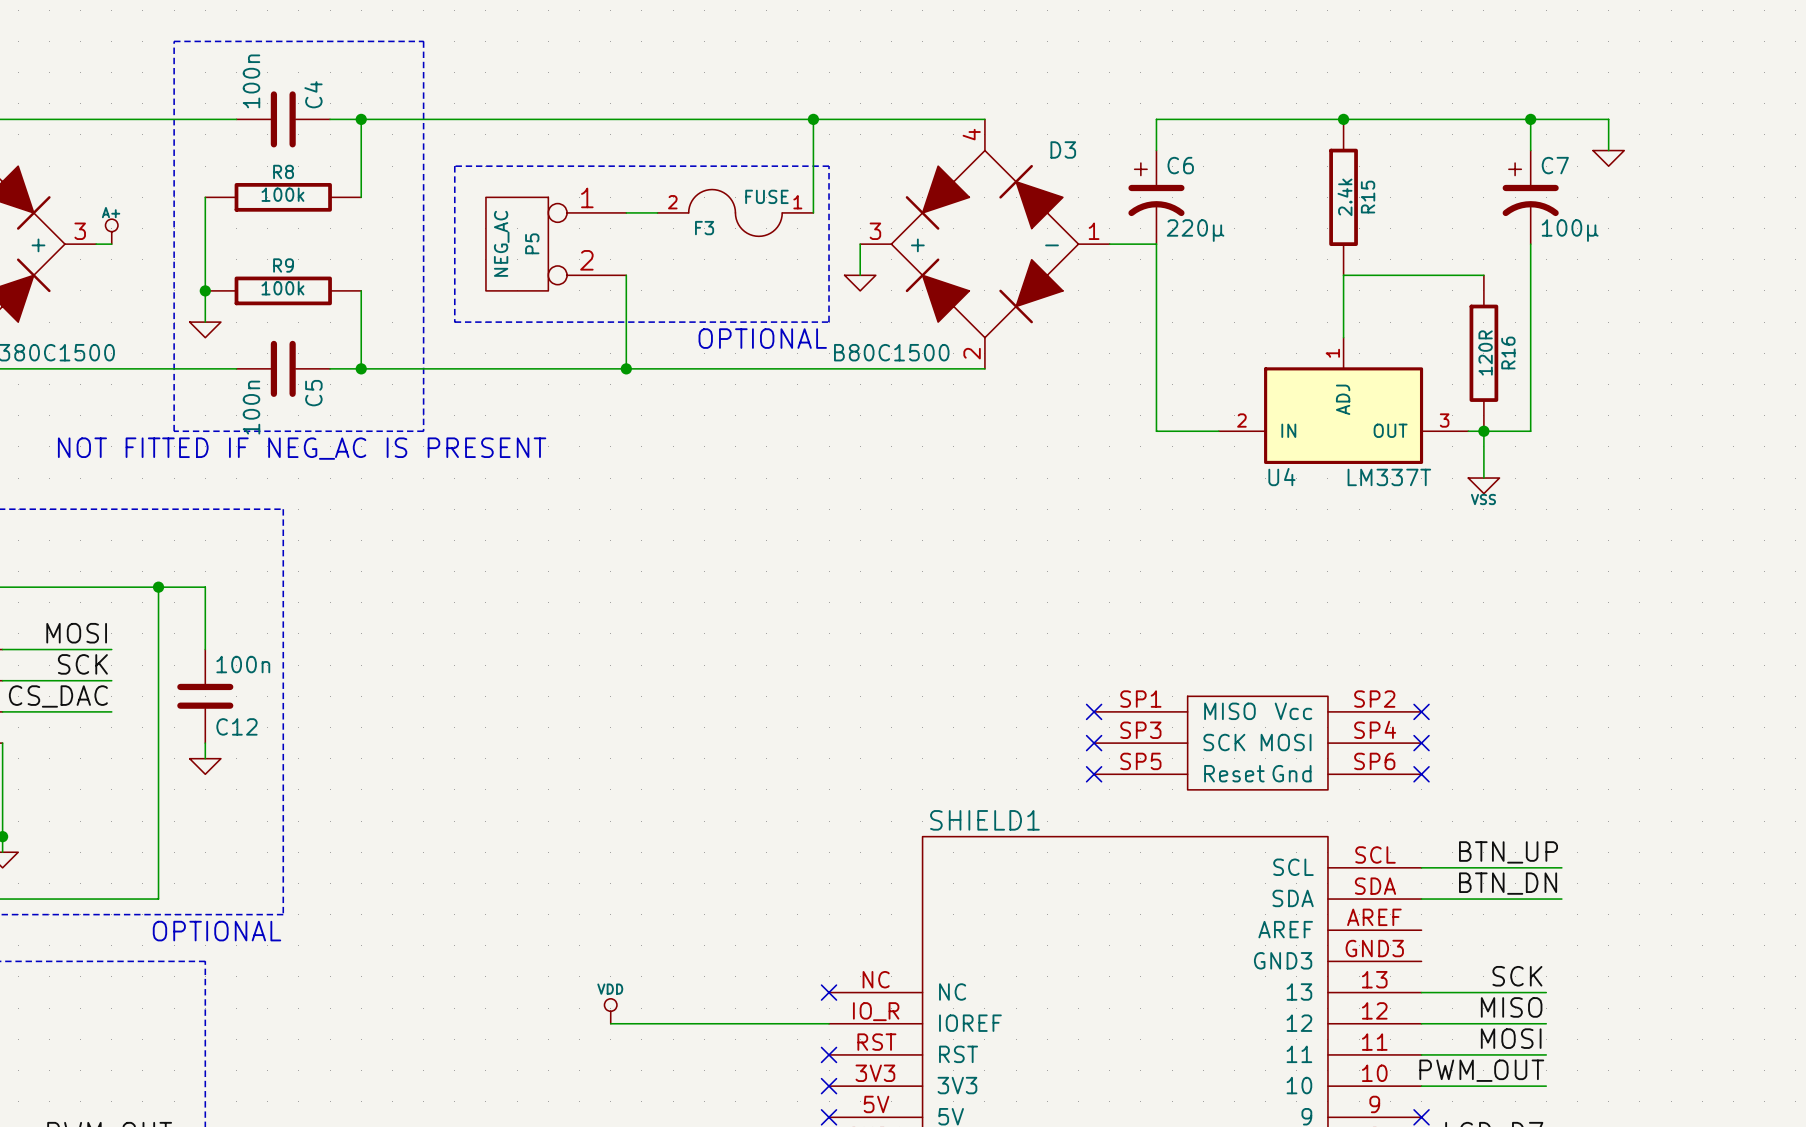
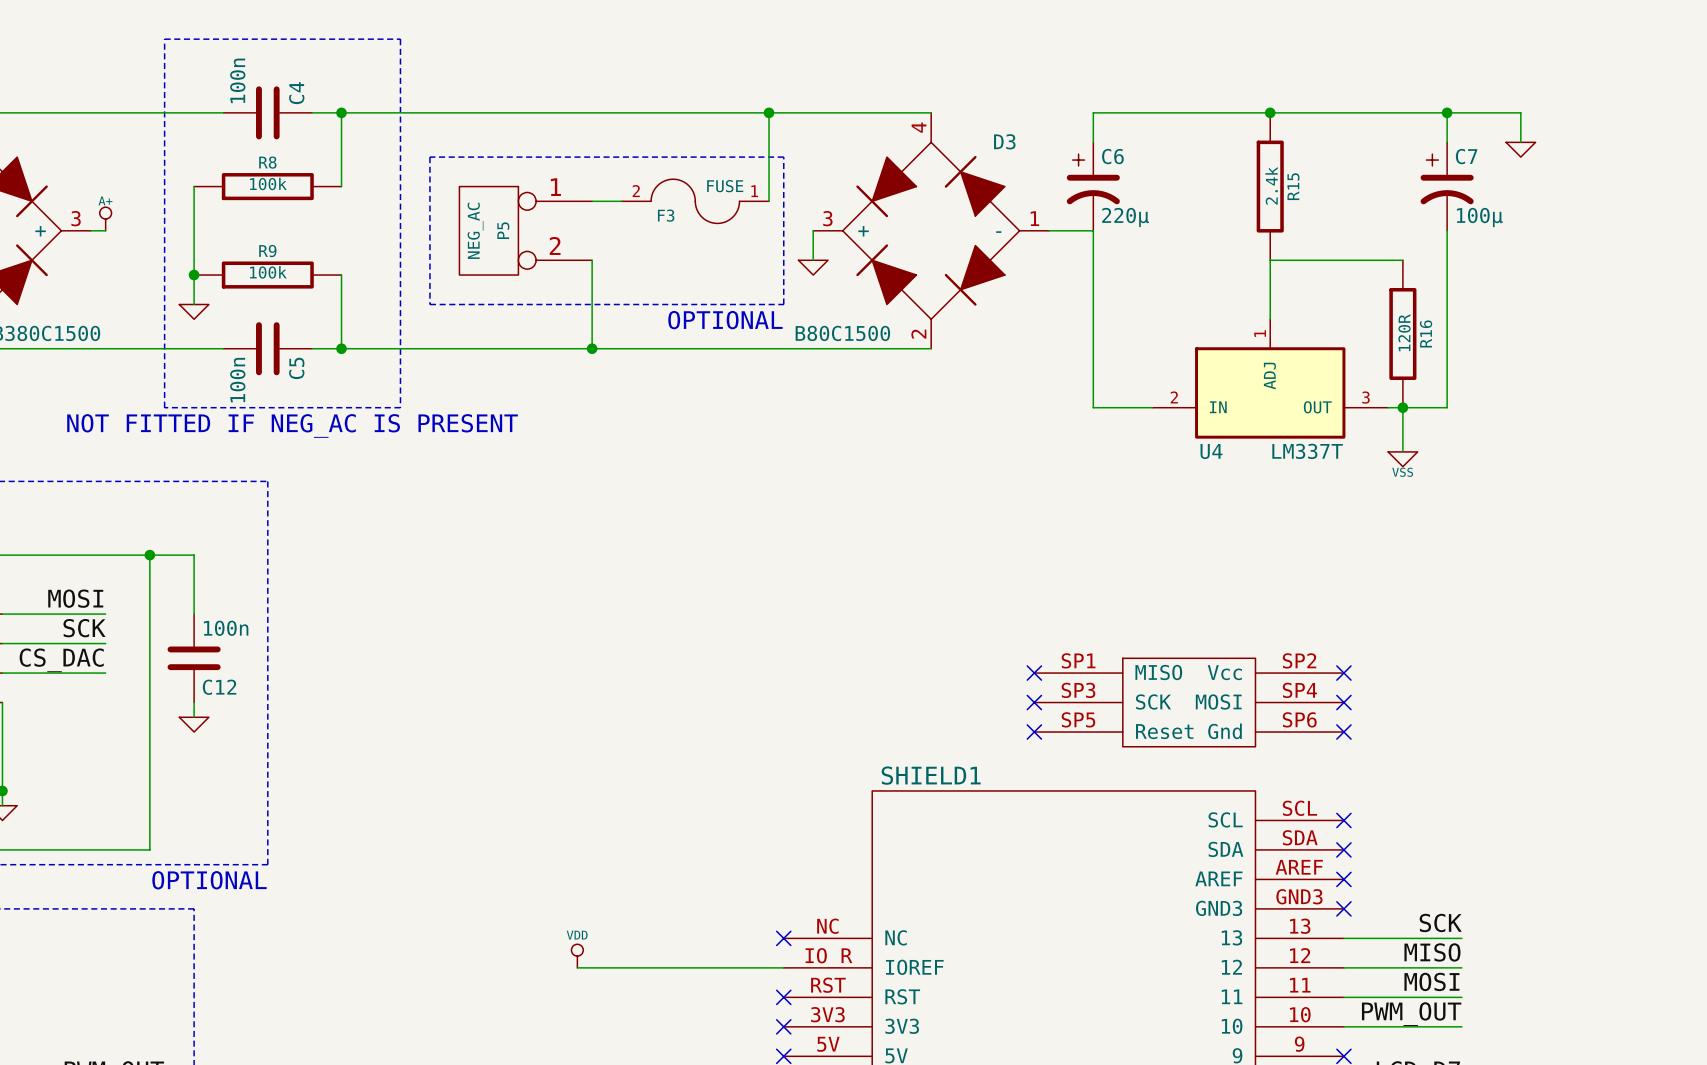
label: BTN_UP (1508, 852) -> none
wire: (1421, 867) (1561, 867) -> none
no-connect mark: none -> (1343, 820)
label: BTN_DN (1508, 883) -> none
wire: (1421, 899) (1561, 899) -> none
no-connect mark: none -> (1343, 849)
no-connect mark: none -> (1343, 879)
no-connect mark: none -> (1343, 908)

